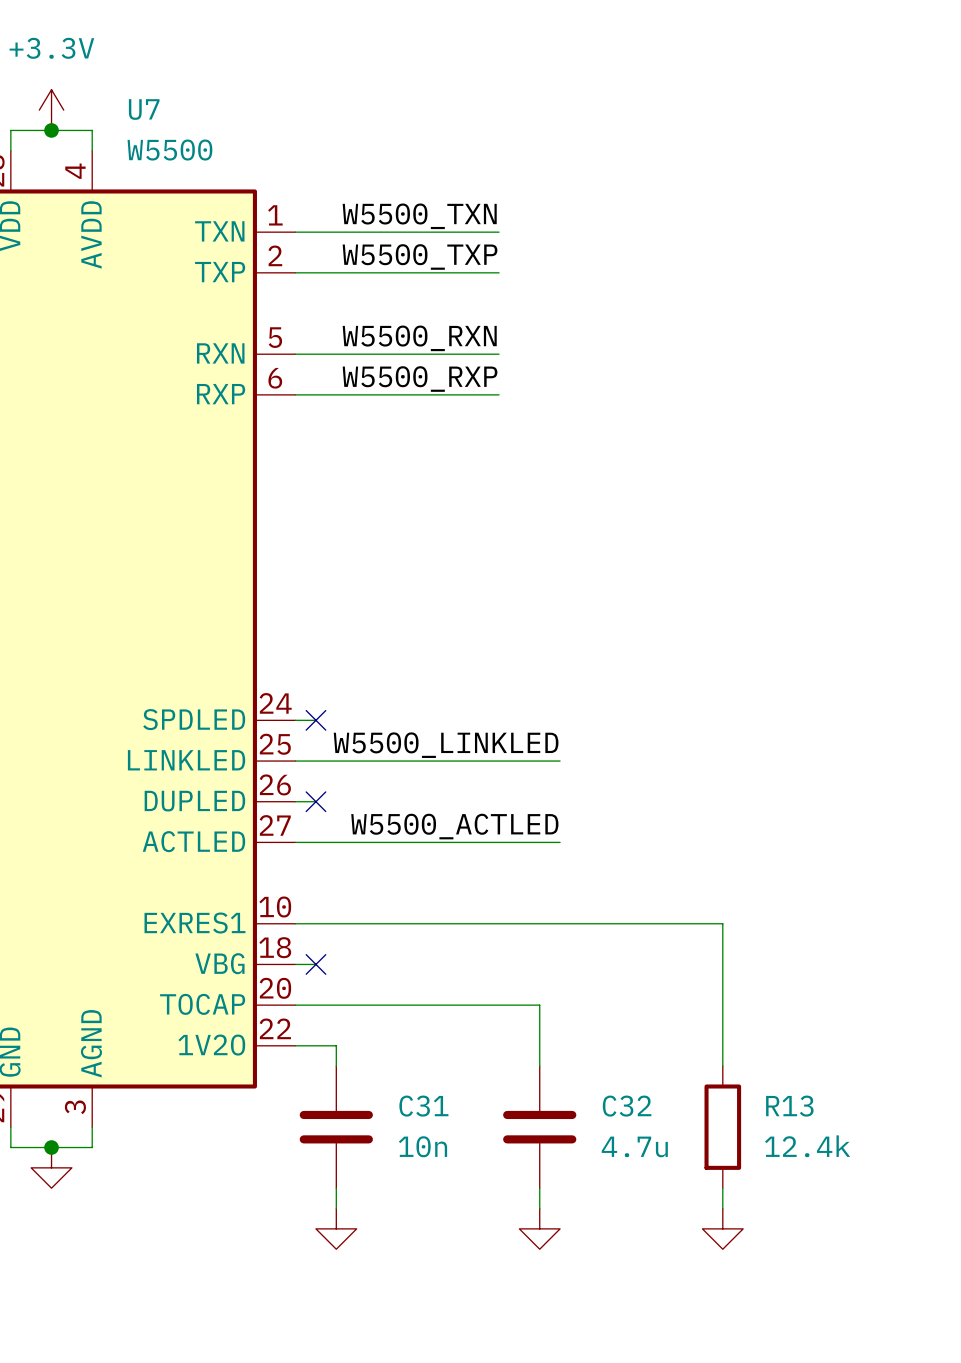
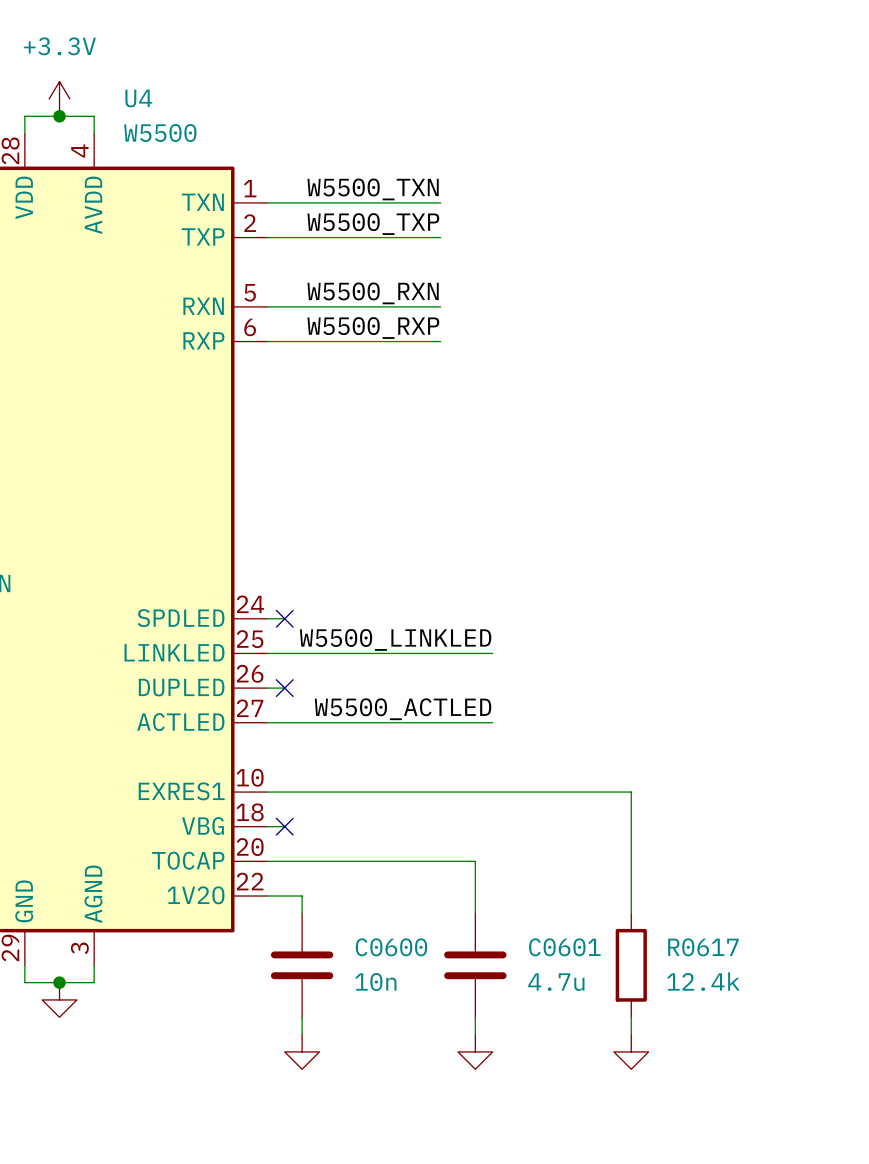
U7 name: U7 (144, 109) -> U4 (138, 98)
C31 name: C31 (423, 1106) -> C0600 (391, 947)
C32 name: C32 (627, 1106) -> C0601 (564, 947)
R13 name: R13 (789, 1106) -> R0617 (703, 947)

